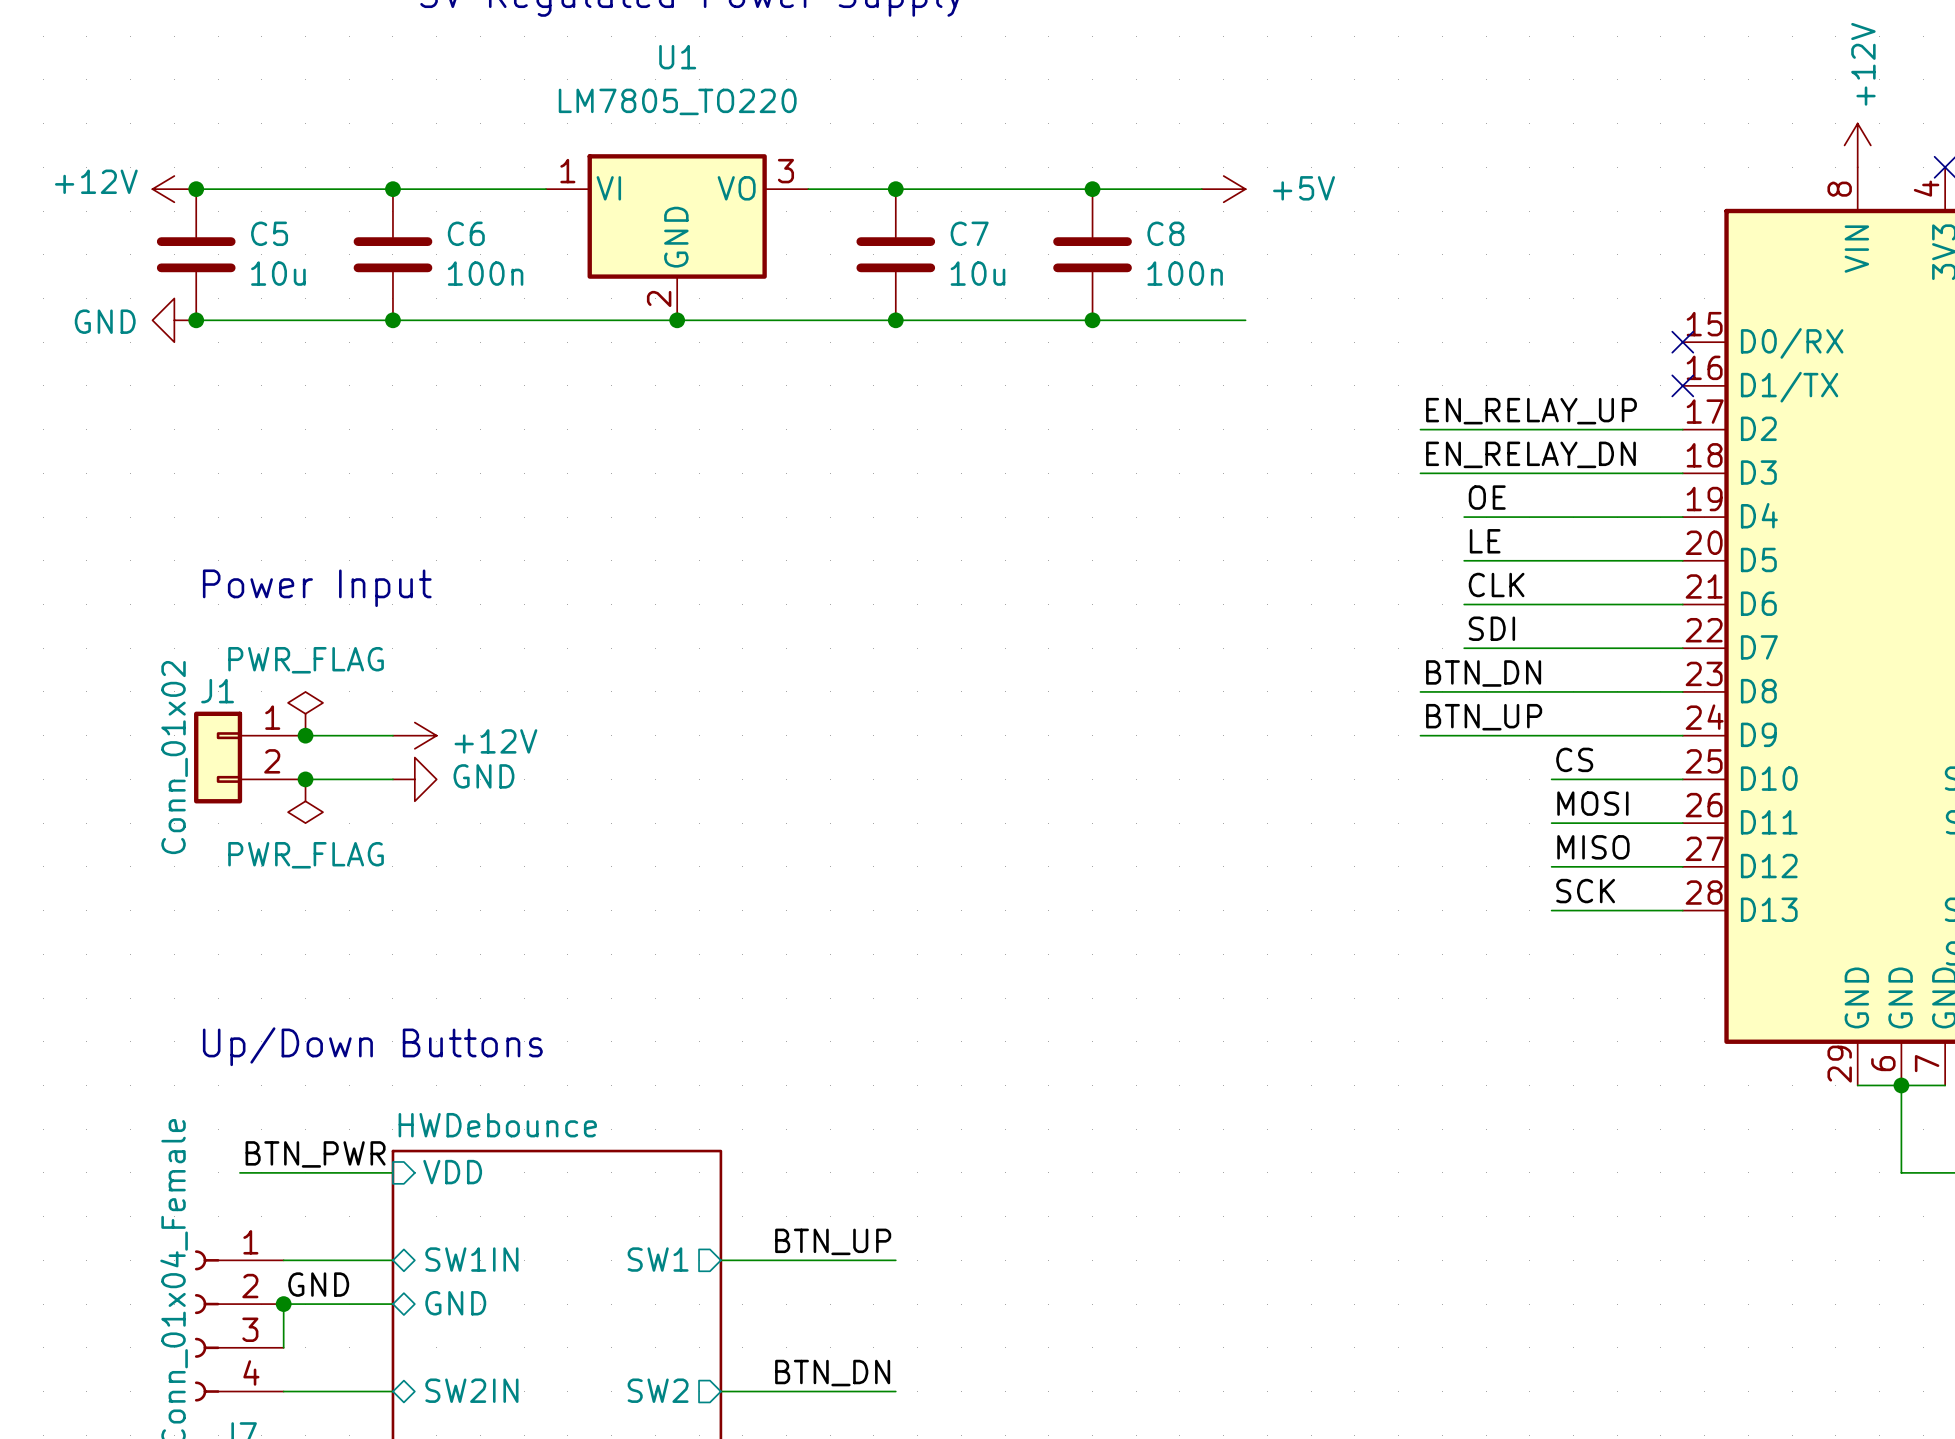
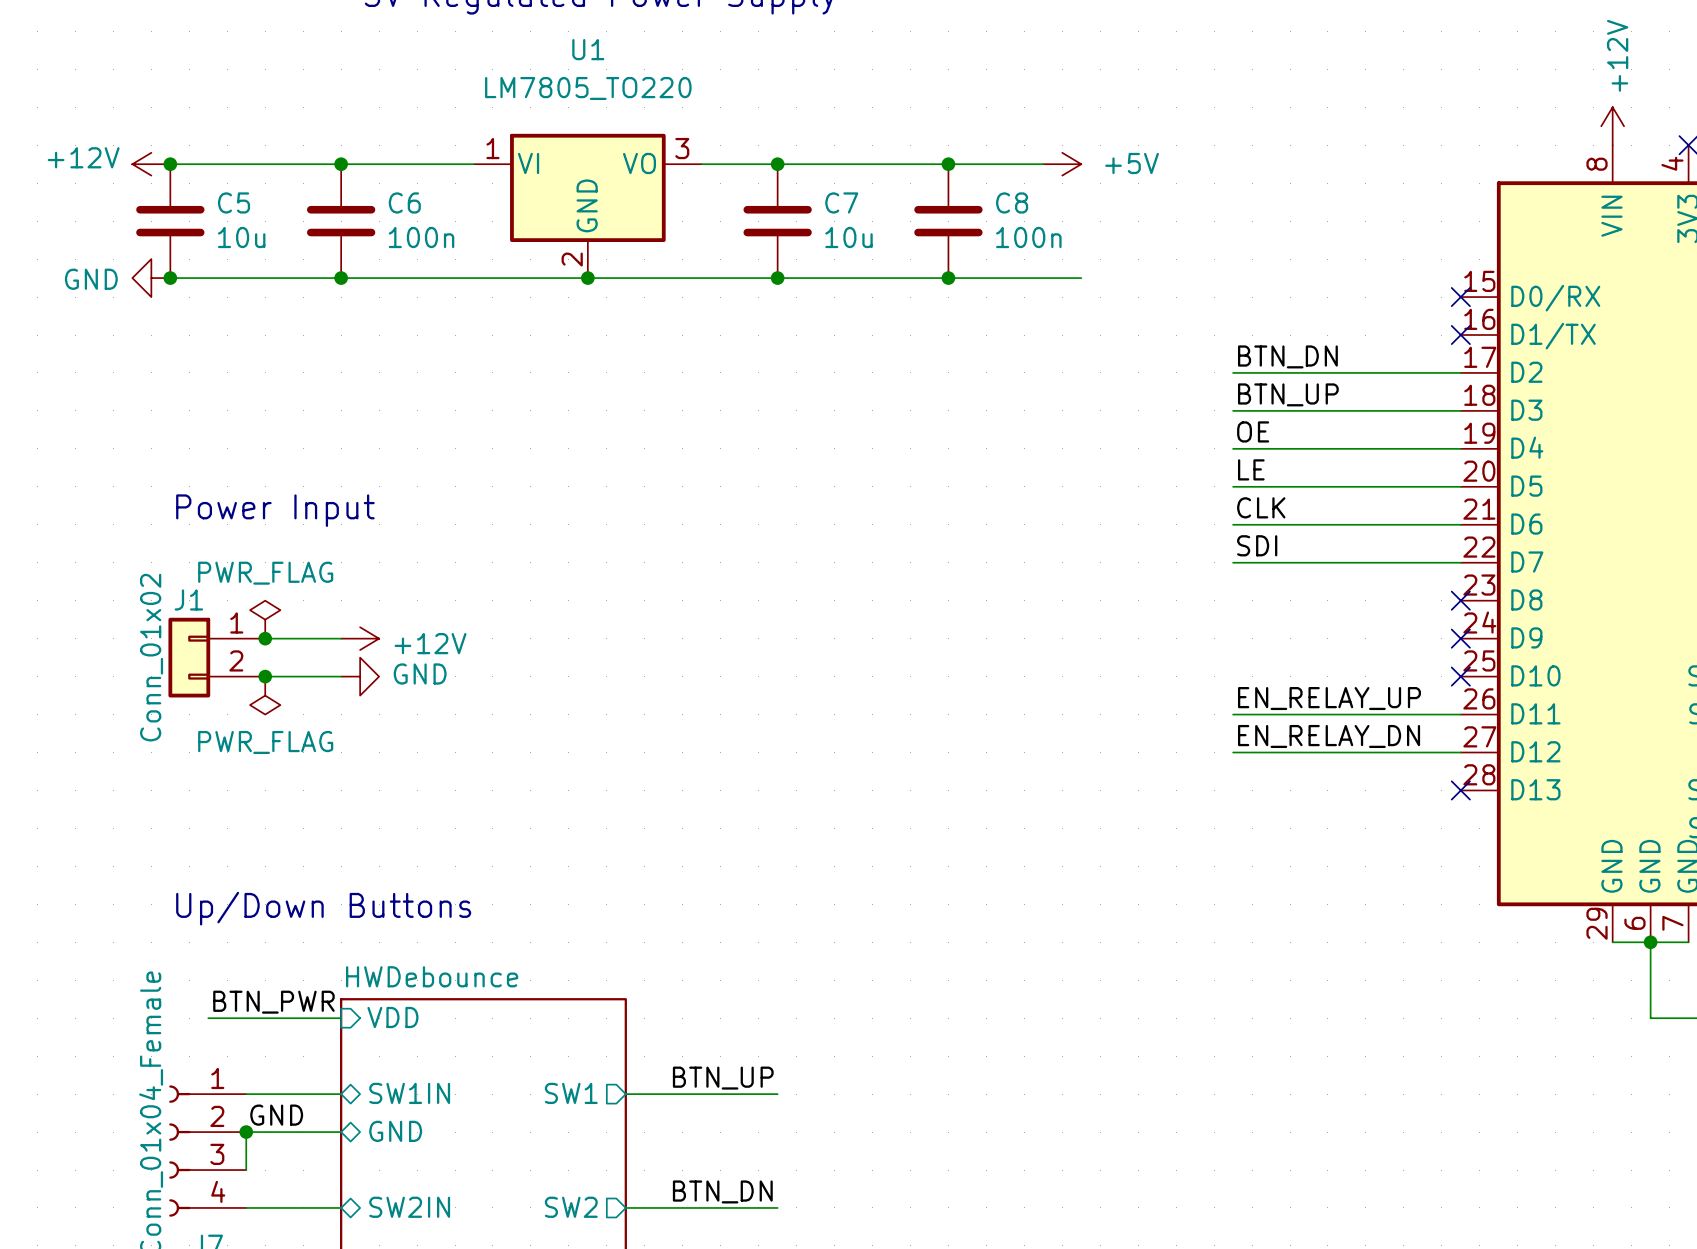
label: EN_RELAY_UP (1531, 411) -> BTN_DN (1287, 356)
label: EN_RELAY_DN (1530, 454) -> BTN_UP (1288, 394)
label position: OE (1487, 497) -> OE (1253, 431)
wire: none -> (1233, 448) (1271, 448)
label position: LE (1485, 541) -> LE (1251, 469)
wire: none -> (1233, 486) (1271, 486)
label position: CLK (1496, 585) -> CLK (1261, 507)
wire: none -> (1233, 524) (1271, 524)
label position: SDI (1491, 628) -> SDI (1257, 545)
wire: none -> (1233, 562) (1271, 562)
label: BTN_DN (1483, 673) -> none
wire: (1420, 691) (1682, 691) -> none
no-connect mark: none -> (1460, 600)
label: BTN_UP (1484, 717) -> none
wire: (1420, 735) (1682, 735) -> none
no-connect mark: none -> (1460, 638)
label: CS (1574, 759) -> none
wire: (1551, 779) (1682, 779) -> (1233, 714) (1346, 714)
no-connect mark: none -> (1460, 676)
label: MOSI (1592, 803) -> none
label: none -> EN_RELAY_UP (1329, 698)
label: MISO (1593, 847) -> none
label: none -> EN_RELAY_DN (1329, 736)
label: SCK (1585, 891) -> none
wire: (1551, 910) (1682, 910) -> (1233, 752) (1346, 752)
no-connect mark: none -> (1460, 790)

